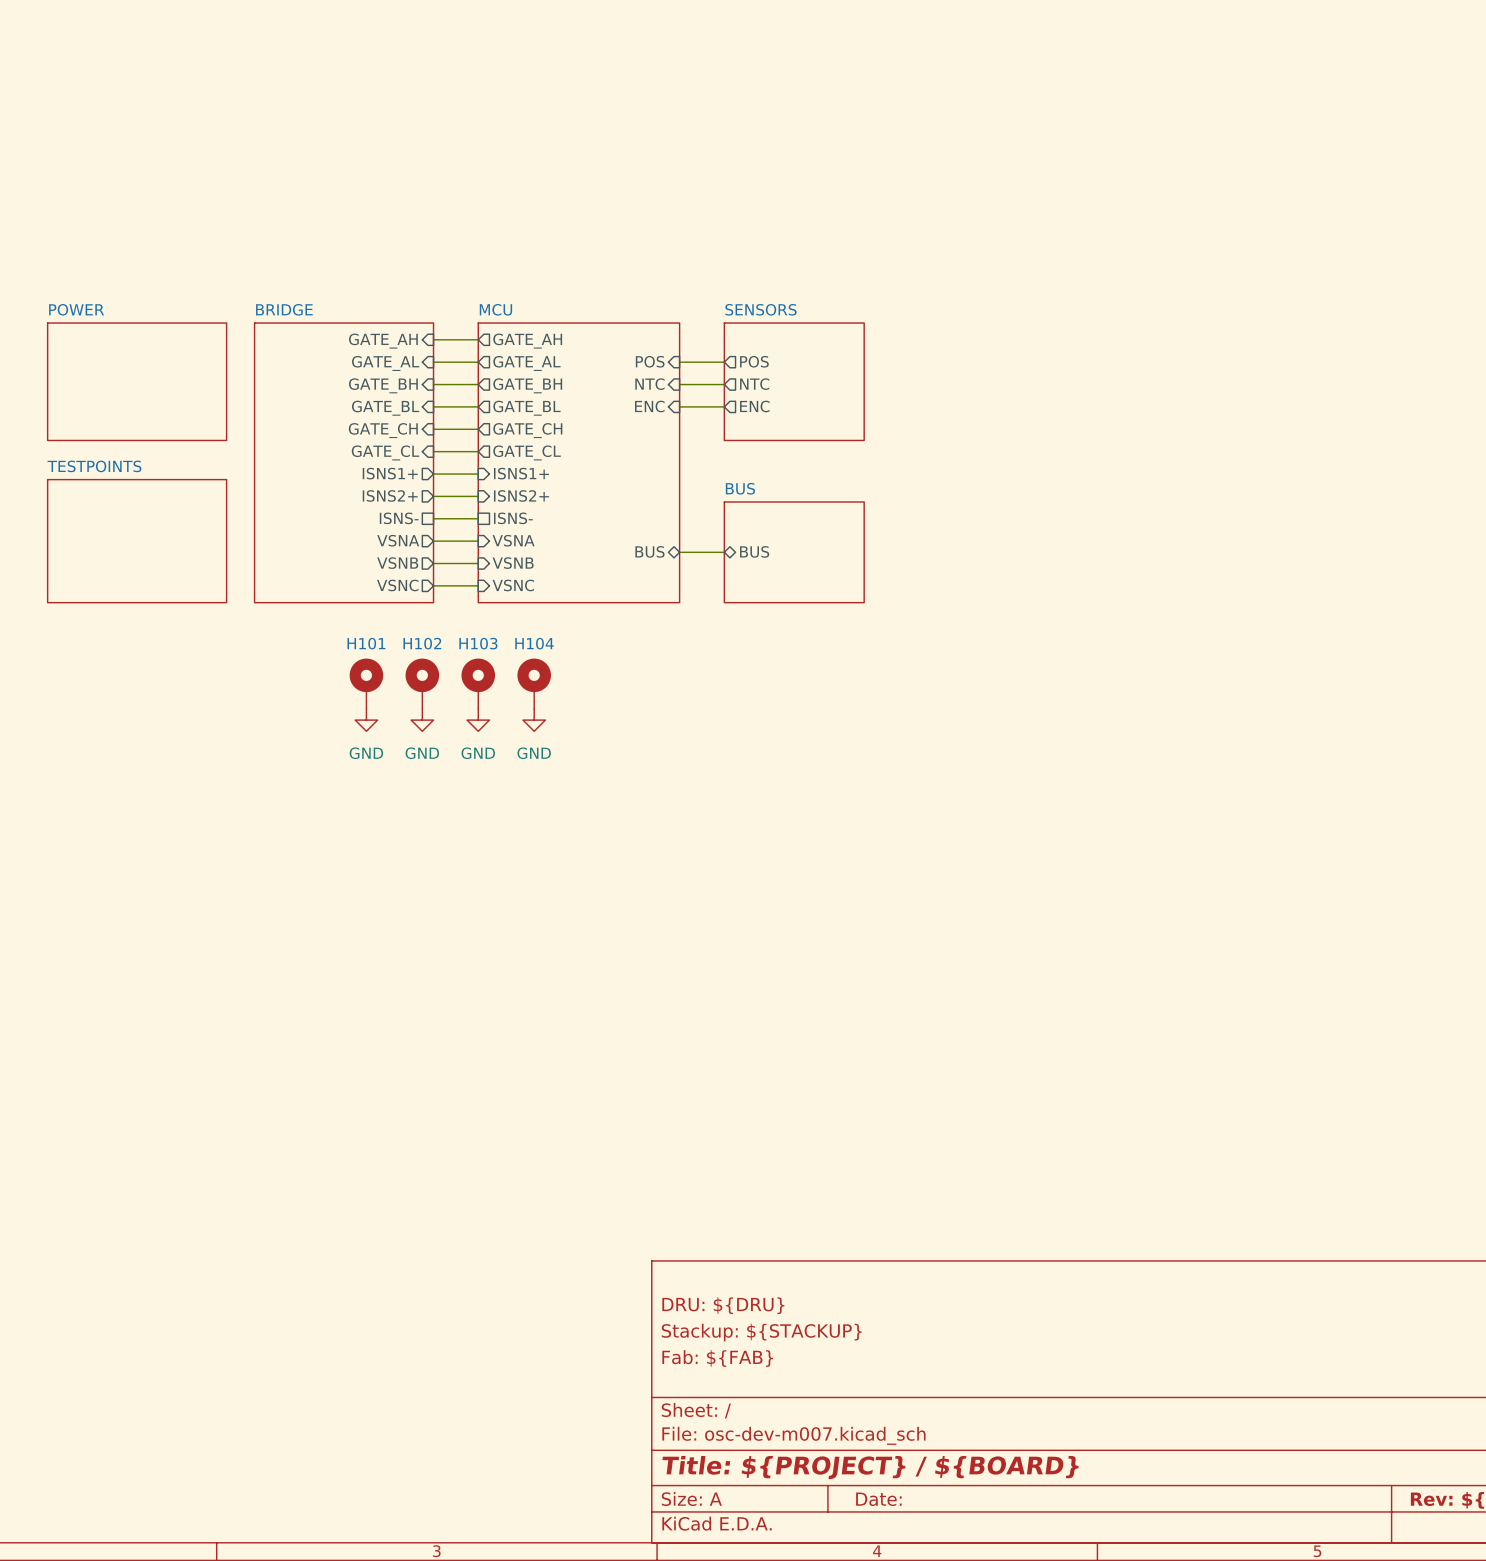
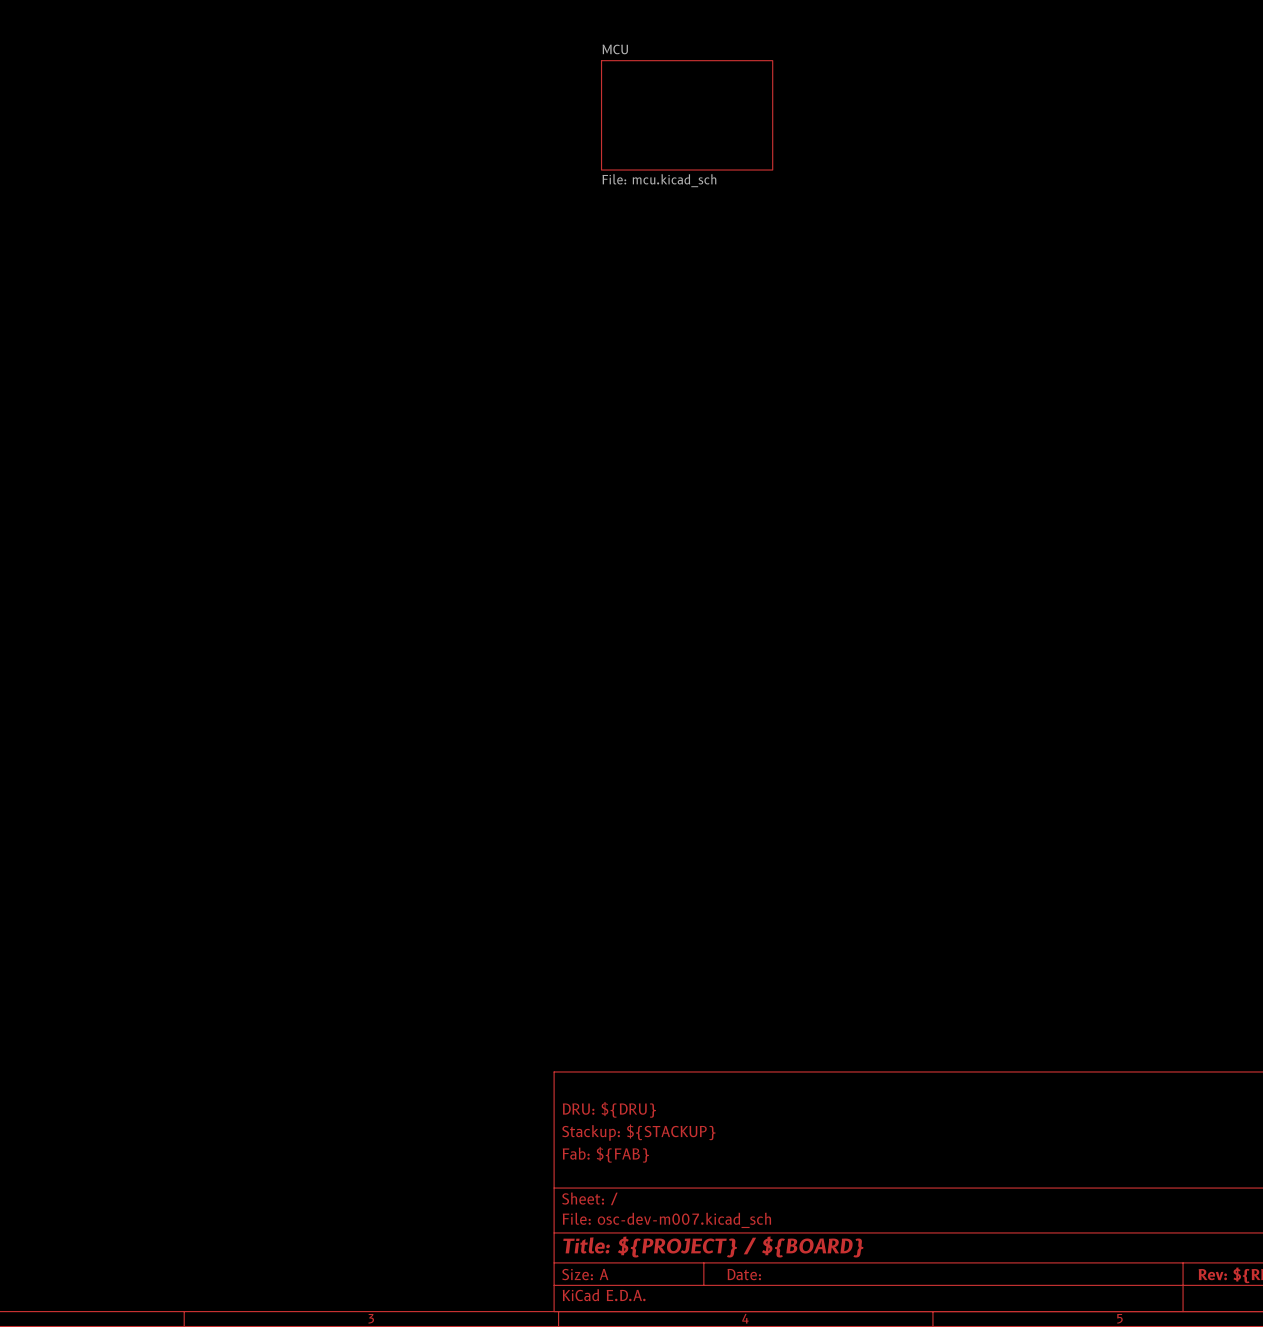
sheet MCU: none -> File: mcu.kicad_sch (687, 115)
wire: (433, 339) (478, 339) -> none
sheet pin: GATE_AH (383, 341) -> none
sheet pin: GATE_AH (527, 341) -> none
sheet pin: POS (650, 361) -> none
sheet pin: POS (754, 361) -> none
wire: (433, 362) (478, 362) -> none
wire: (679, 362) (724, 362) -> none
sheet pin: GATE_AL (385, 363) -> none
sheet pin: GATE_AL (526, 363) -> none
sheet POWER: (137, 381) -> none
sheet SENSORS: (794, 381) -> none
wire: (433, 384) (478, 384) -> none
sheet pin: NTC (649, 384) -> none
wire: (679, 384) (724, 384) -> none
sheet pin: NTC (754, 384) -> none
sheet pin: GATE_BH (383, 385) -> none
sheet pin: GATE_BH (527, 385) -> none
wire: (433, 406) (478, 406) -> none
sheet pin: ENC (649, 406) -> none
wire: (679, 406) (724, 406) -> none
sheet pin: ENC (754, 406) -> none
sheet pin: GATE_BL (385, 408) -> none
sheet pin: GATE_BL (526, 408) -> none
wire: (433, 429) (478, 429) -> none
sheet pin: GATE_CH (383, 430) -> none
sheet pin: GATE_CH (527, 430) -> none
wire: (433, 451) (478, 451) -> none
sheet pin: GATE_CL (385, 452) -> none
sheet pin: GATE_CL (527, 452) -> none
sheet BRIDGE: (344, 462) -> none
sheet MCU: (578, 462) -> none
sheet pin: ISNS1+ (390, 473) -> none
sheet pin: ISNS1+ (521, 473) -> none
wire: (433, 474) (478, 474) -> none
sheet pin: ISNS2+ (390, 495) -> none
sheet pin: ISNS2+ (521, 495) -> none
wire: (433, 496) (478, 496) -> none
sheet pin: ISNS- (399, 518) -> none
wire: (433, 518) (478, 518) -> none
sheet pin: ISNS- (513, 518) -> none
sheet pin: VSNA (398, 540) -> none
sheet pin: VSNA (513, 540) -> none
sheet TESTPOINTS: (137, 541) -> none
wire: (433, 541) (478, 541) -> none
sheet pin: BUS (649, 551) -> none
sheet pin: BUS (754, 551) -> none
wire: (679, 552) (724, 552) -> none
sheet BUS: (794, 552) -> none
sheet pin: VSNB (397, 563) -> none
wire: (433, 563) (478, 563) -> none
sheet pin: VSNB (513, 563) -> none
sheet pin: VSNC (397, 585) -> none
wire: (433, 585) (478, 585) -> none
sheet pin: VSNC (513, 585) -> none
H101: (366, 683) -> none
H102: (422, 683) -> none
H103: (478, 683) -> none
H104: (534, 683) -> none
power symbol: GND (366, 720) -> none
power symbol: GND (422, 720) -> none
power symbol: GND (478, 720) -> none
power symbol: GND (534, 720) -> none

